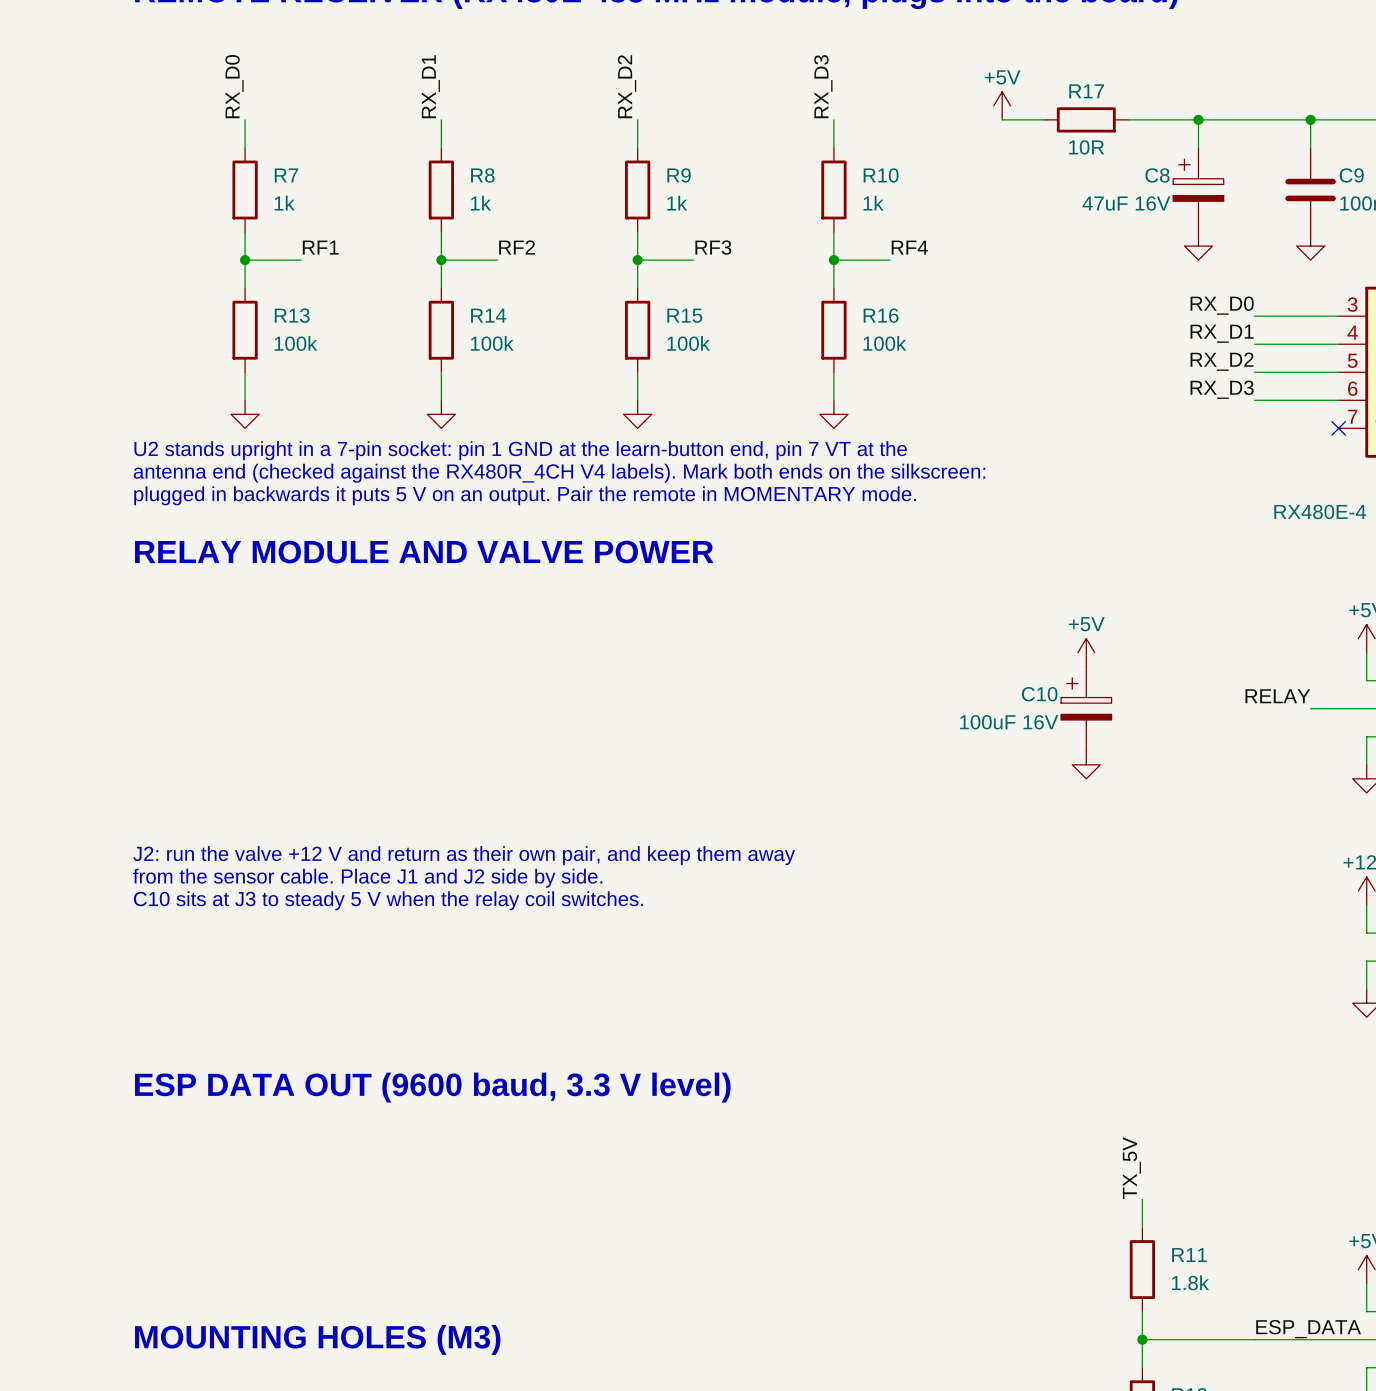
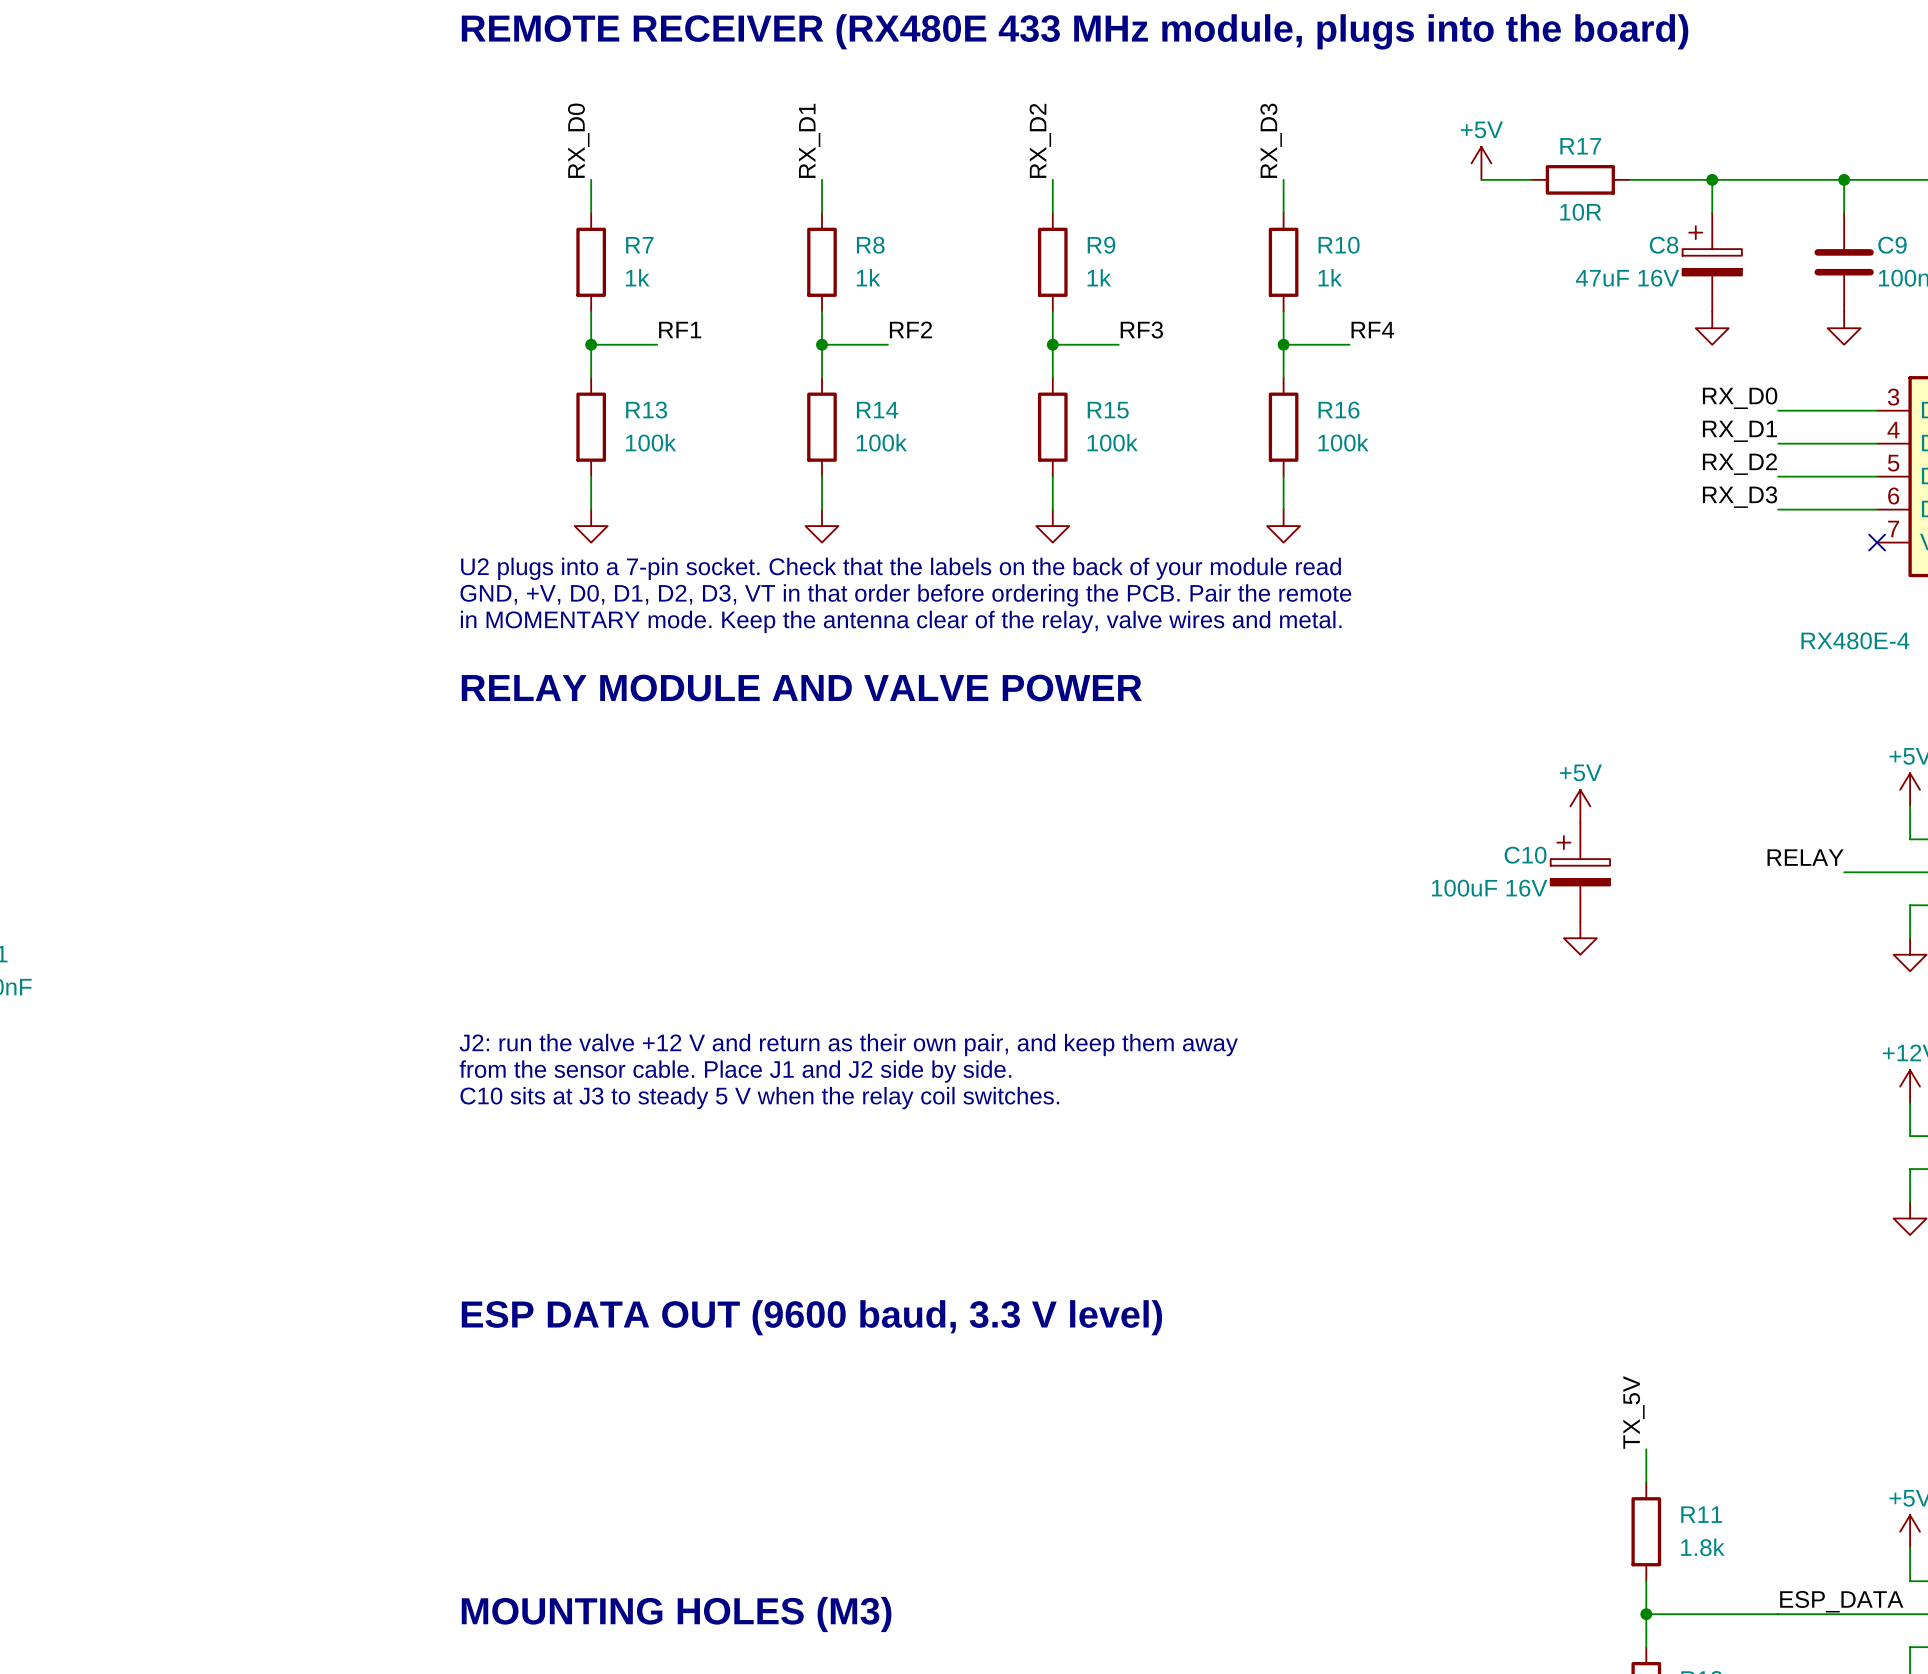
text: U2 stands upright in a 7-pin socket: pin 1 GND at the learn-button end, pin 7 VT at the (520, 450) -> U2 plugs into a 7-pin socket. Check that the labels on the back of your module read (901, 568)
text: antenna end (checked against the RX480R_4CH V4 labels). Mark both ends on the silkscreen: (559, 473) -> GND, +V, D0, D1, D2, D3, VT in that order before ordering the PCB. Pair the remote (905, 595)
text: plugged in backwards it puts 5 V on an output. Pair the remote in MOMENTARY mode. (525, 495) -> in MOMENTARY mode. Keep the antenna clear of the relay, valve wires and metal. (901, 621)

